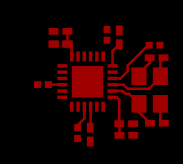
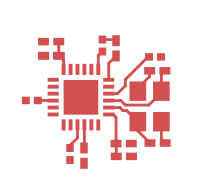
top track: none -> (102, 39) (116, 40)
top track: none -> (102, 51) (98, 55) (98, 69)

